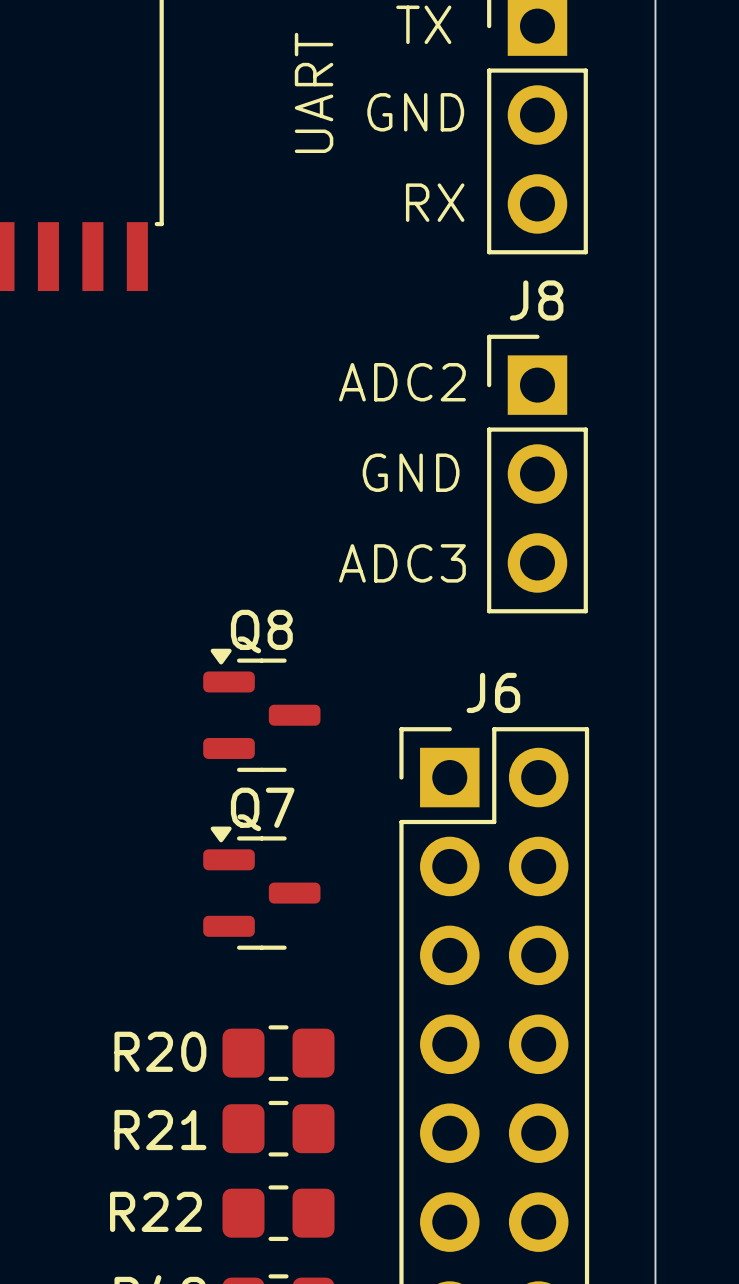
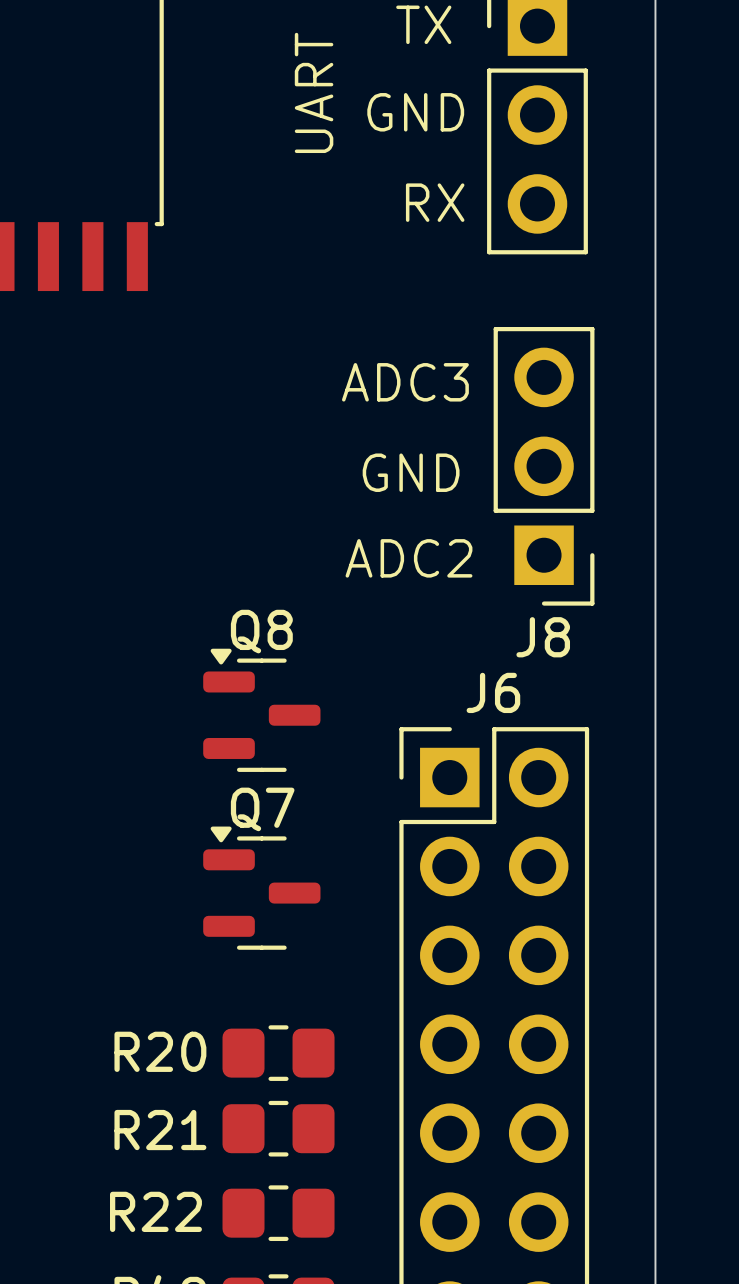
text: ADC2 (402, 382) -> ADC3 (405, 382)
J8 rotation: 0° (537, 474) -> 180° (544, 466)
text: ADC3 (402, 563) -> ADC2 (409, 558)

